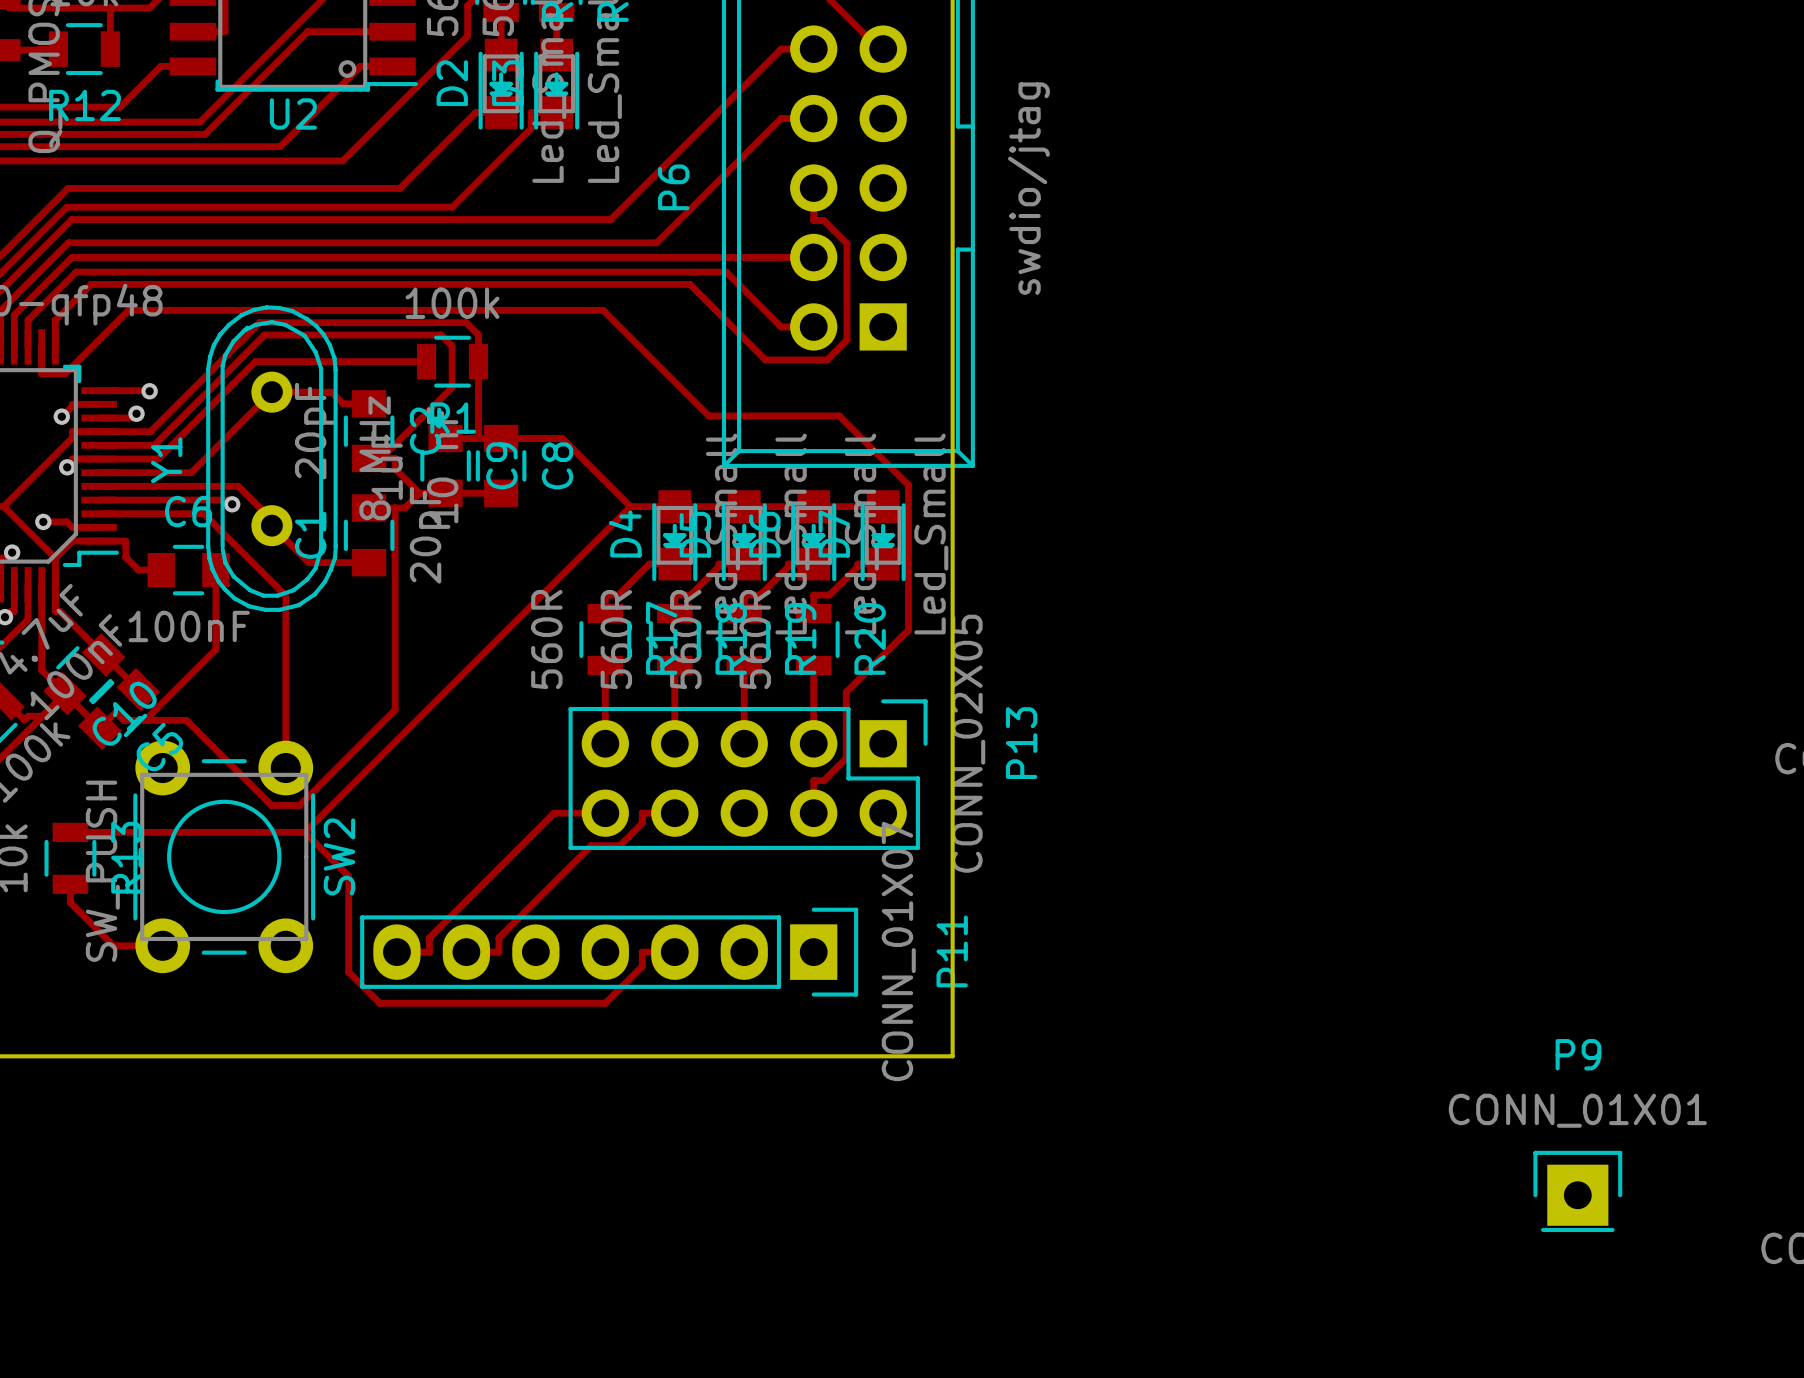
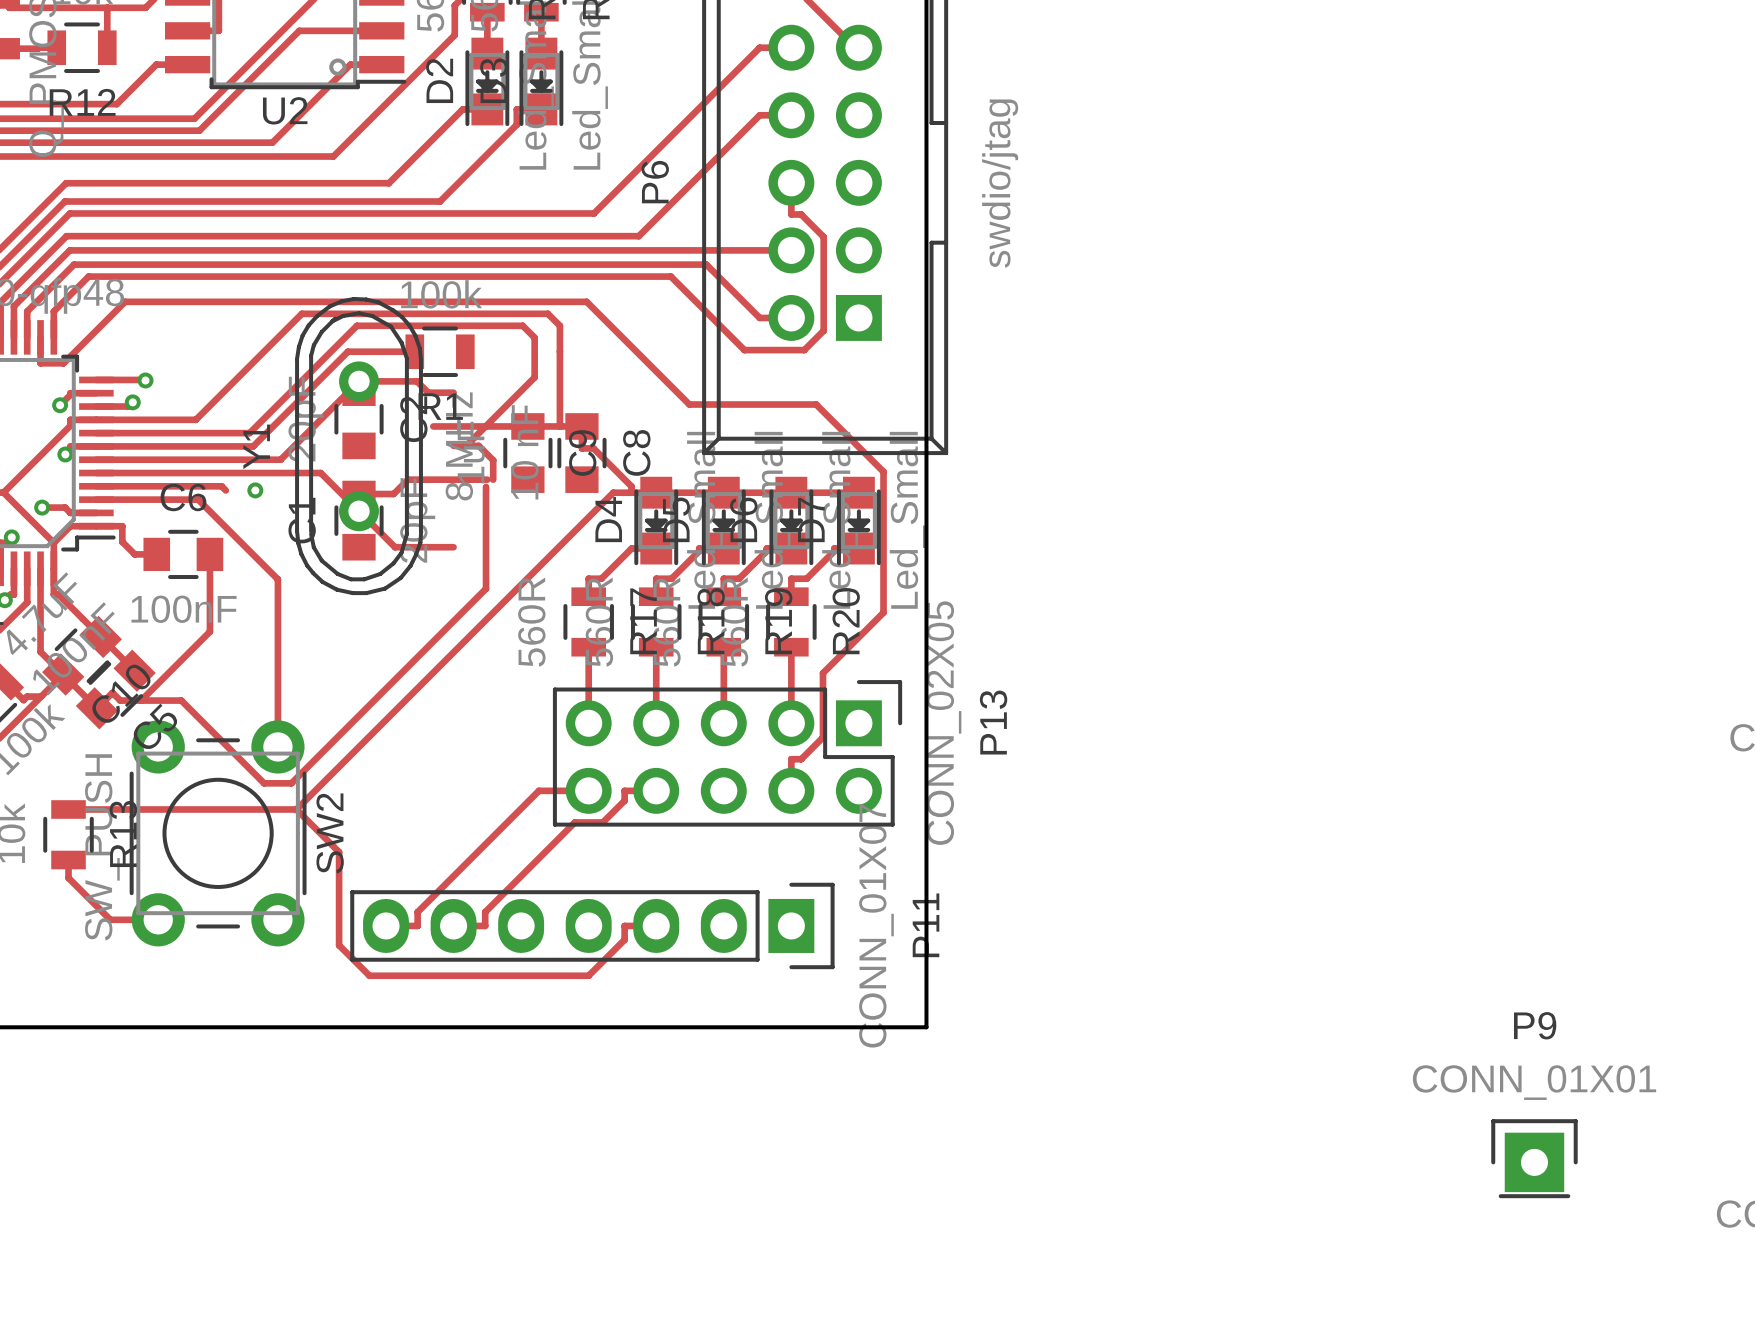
track: (310, 322) (259, 322) (150, 431) -> (301, 313) (195, 419) (146, 419)
track: (466, 322) (478, 334) (478, 438) -> (453, 313) (547, 313) (559, 325) (559, 426)
track: (367, 334) (264, 334) (154, 445) -> (356, 325) (249, 433) (150, 433)
track: (441, 334) (452, 345) (452, 387) (385, 454) (385, 458) -> (429, 325) (522, 325) (534, 337) (534, 377) (466, 445)
track: (357, 361) (255, 361) (157, 459) -> (347, 351) (253, 446) (153, 446)
track: (369, 403) (343, 403) (331, 392) (271, 392) (191, 472) -> (453, 392) (428, 392) (417, 381) (359, 381) (280, 459) (186, 459)
track: (562, 438) (630, 506) -> (546, 426) (581, 426) (581, 448) (593, 448) (631, 486) (631, 492)
Y1 position: (272, 458) -> (359, 446)
track: (369, 458) (395, 458) (395, 468) (419, 493) -> none
track: none -> (453, 445) (478, 445) (493, 460) (493, 479)
C9 position: (445, 465) -> (527, 453)
C8 position: (501, 465) -> (581, 453)
track: (238, 486) (271, 519) (271, 525) (308, 562) (369, 562) -> (231, 473) (320, 473) (394, 547) (453, 547)
via position: (232, 504) -> (255, 490)
track: (395, 507) (395, 710) -> (486, 486) (486, 588) (384, 690)

